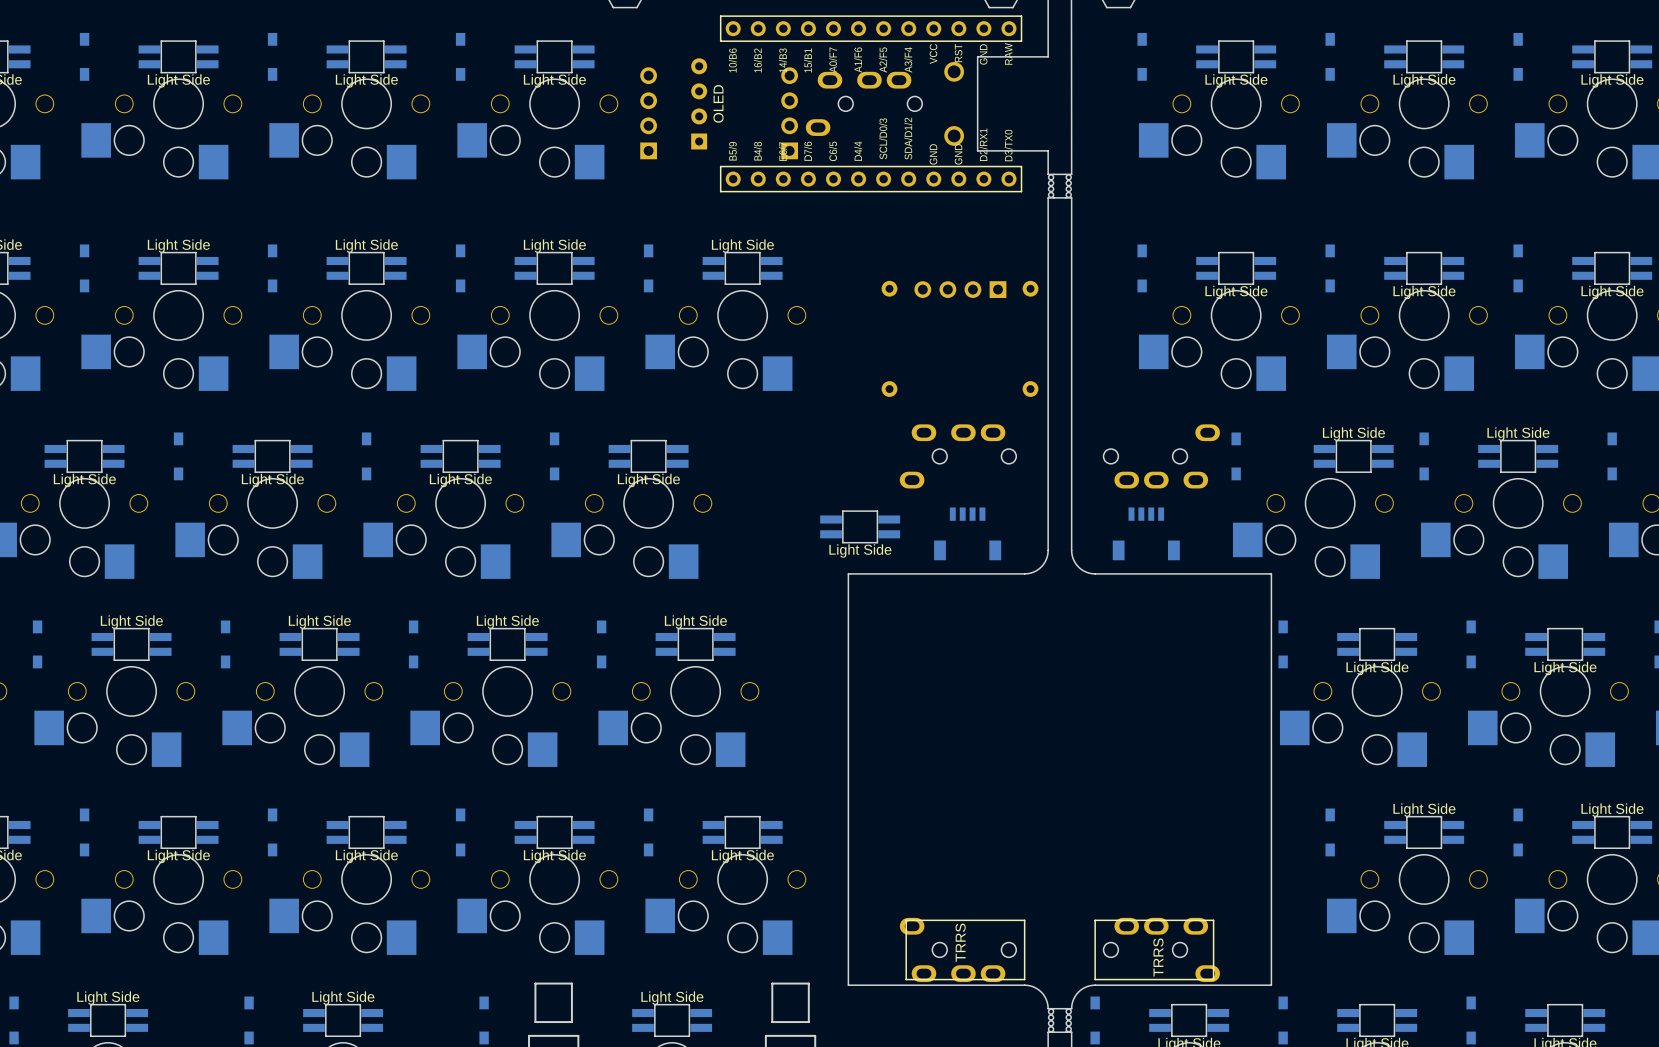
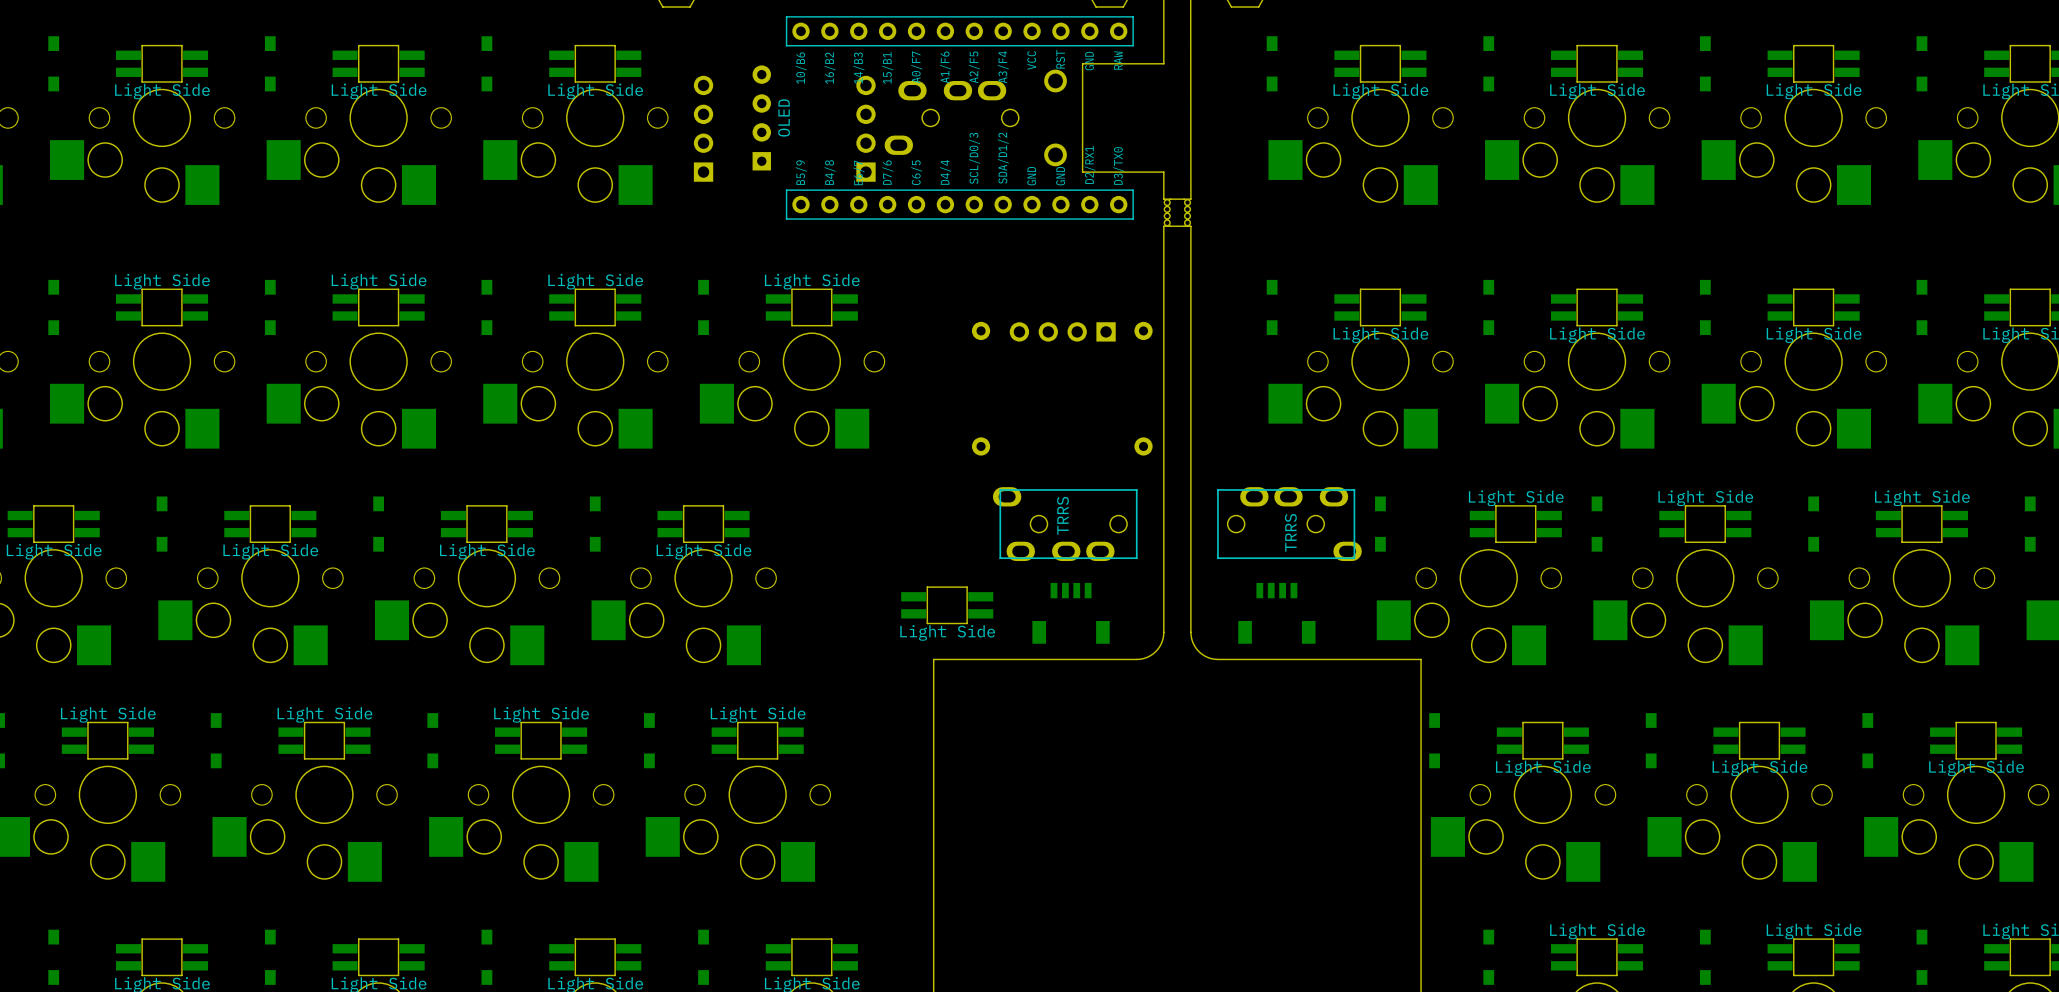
part side: bottom (958, 456) -> top (1065, 524)
part side: bottom (1161, 456) -> top (1289, 524)

